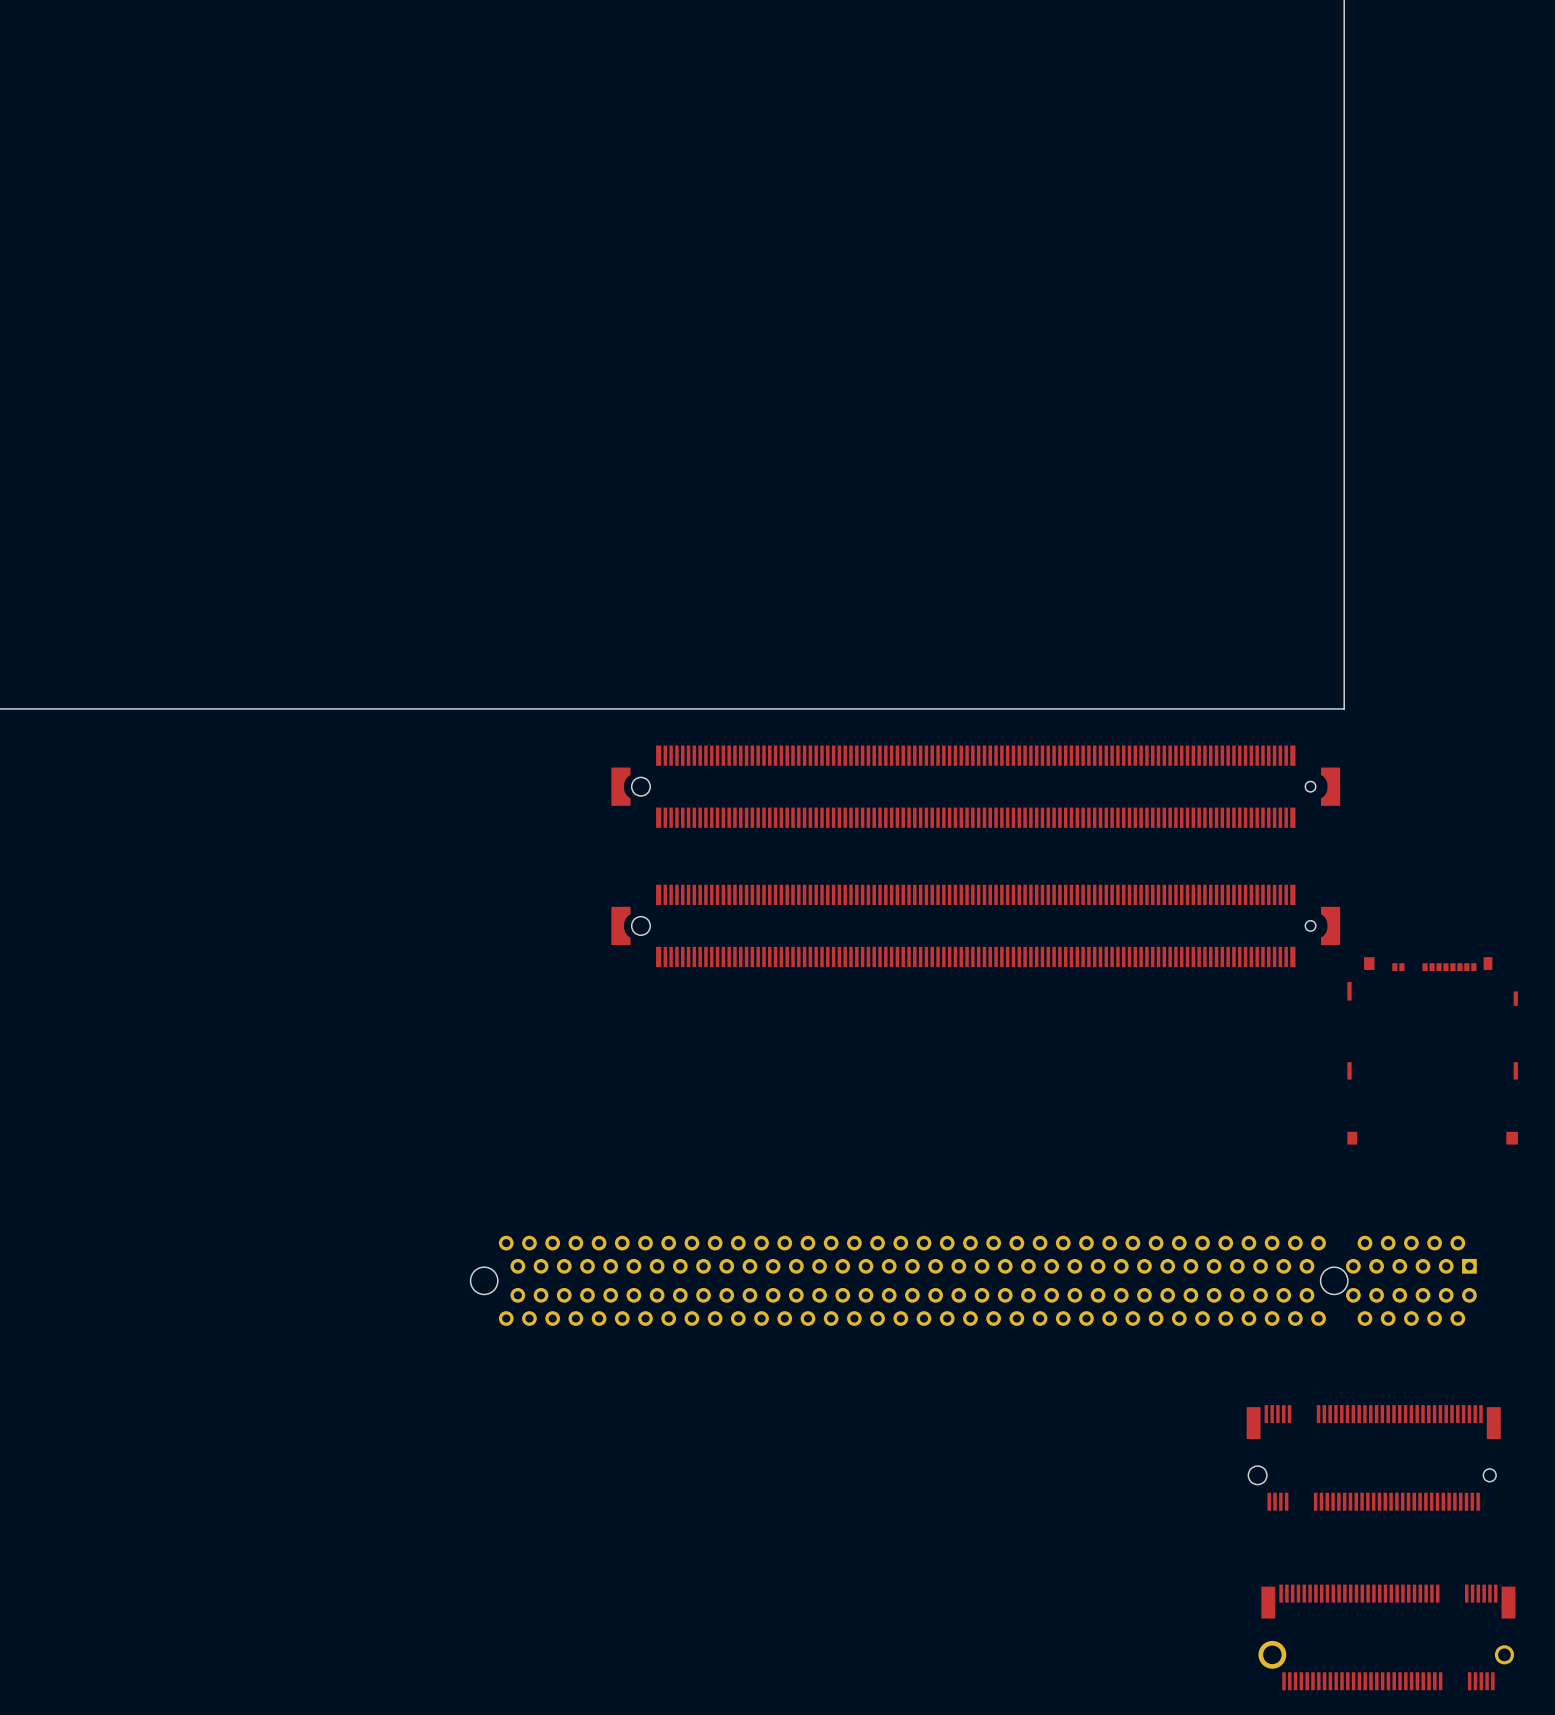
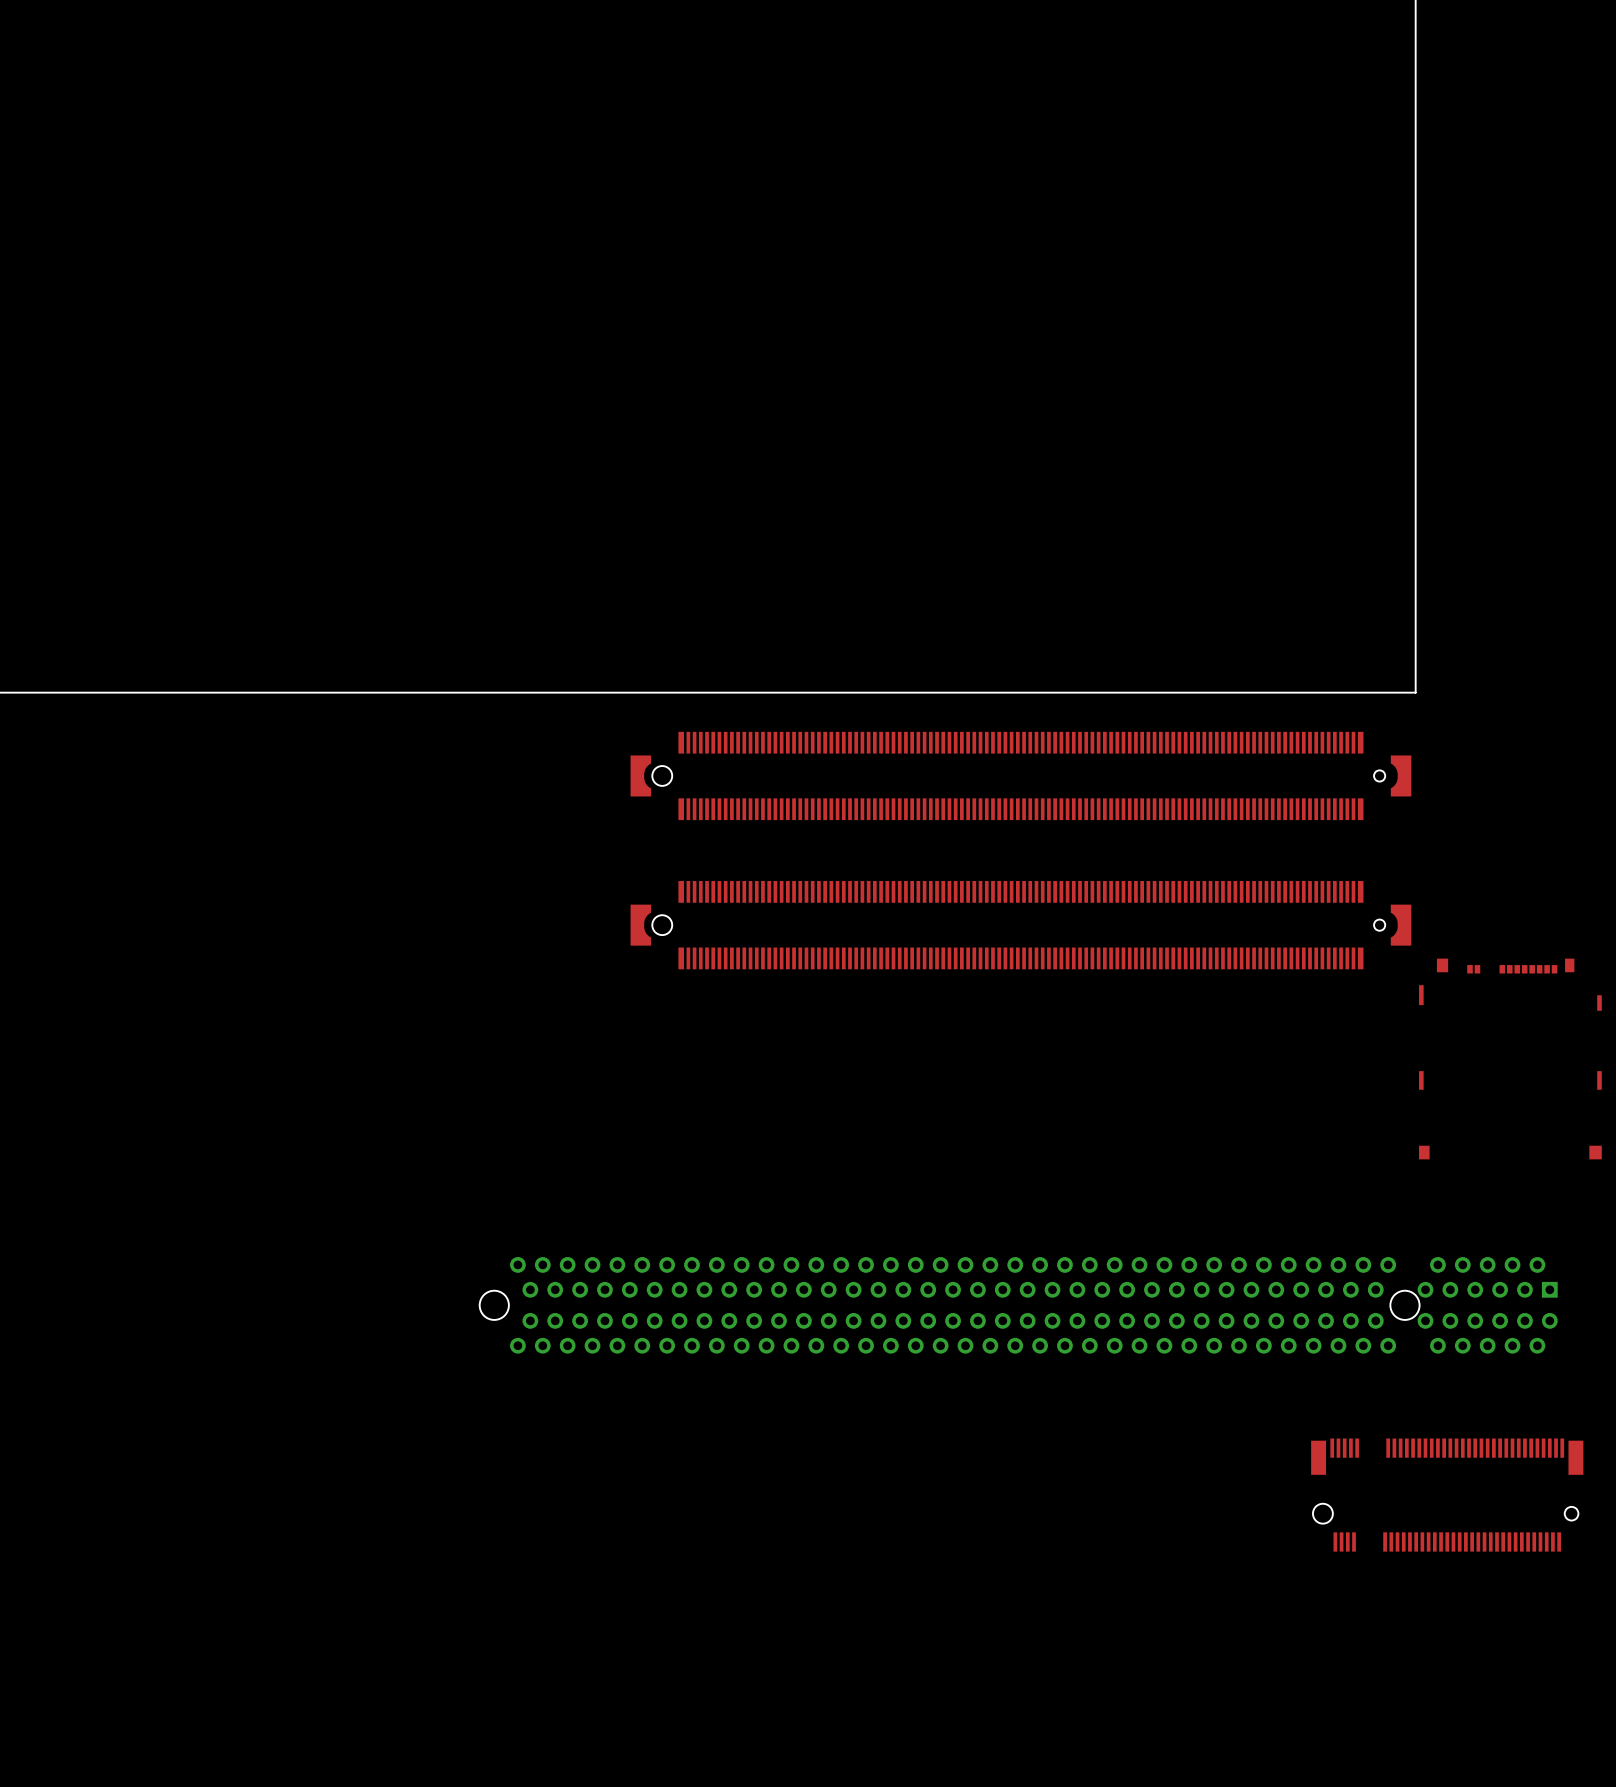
part: (1386, 1637) -> none

